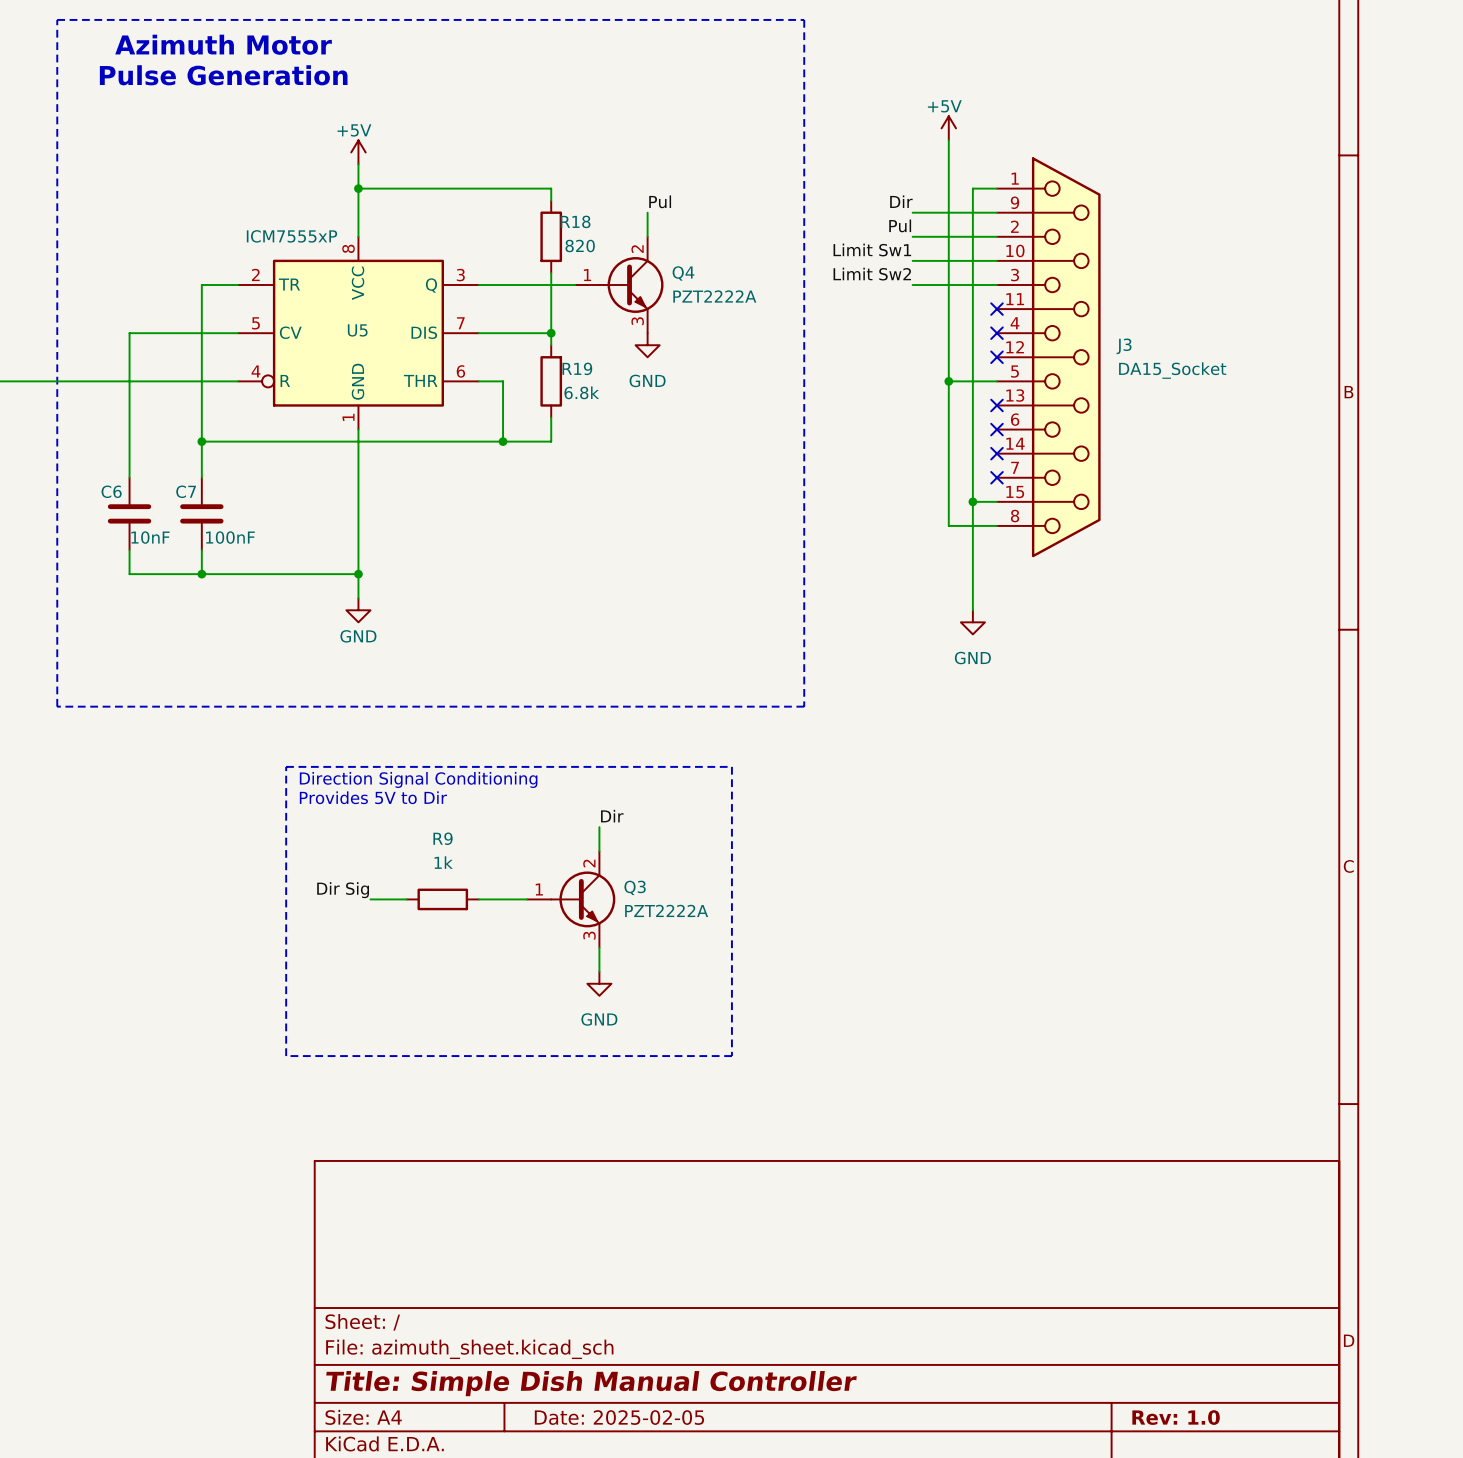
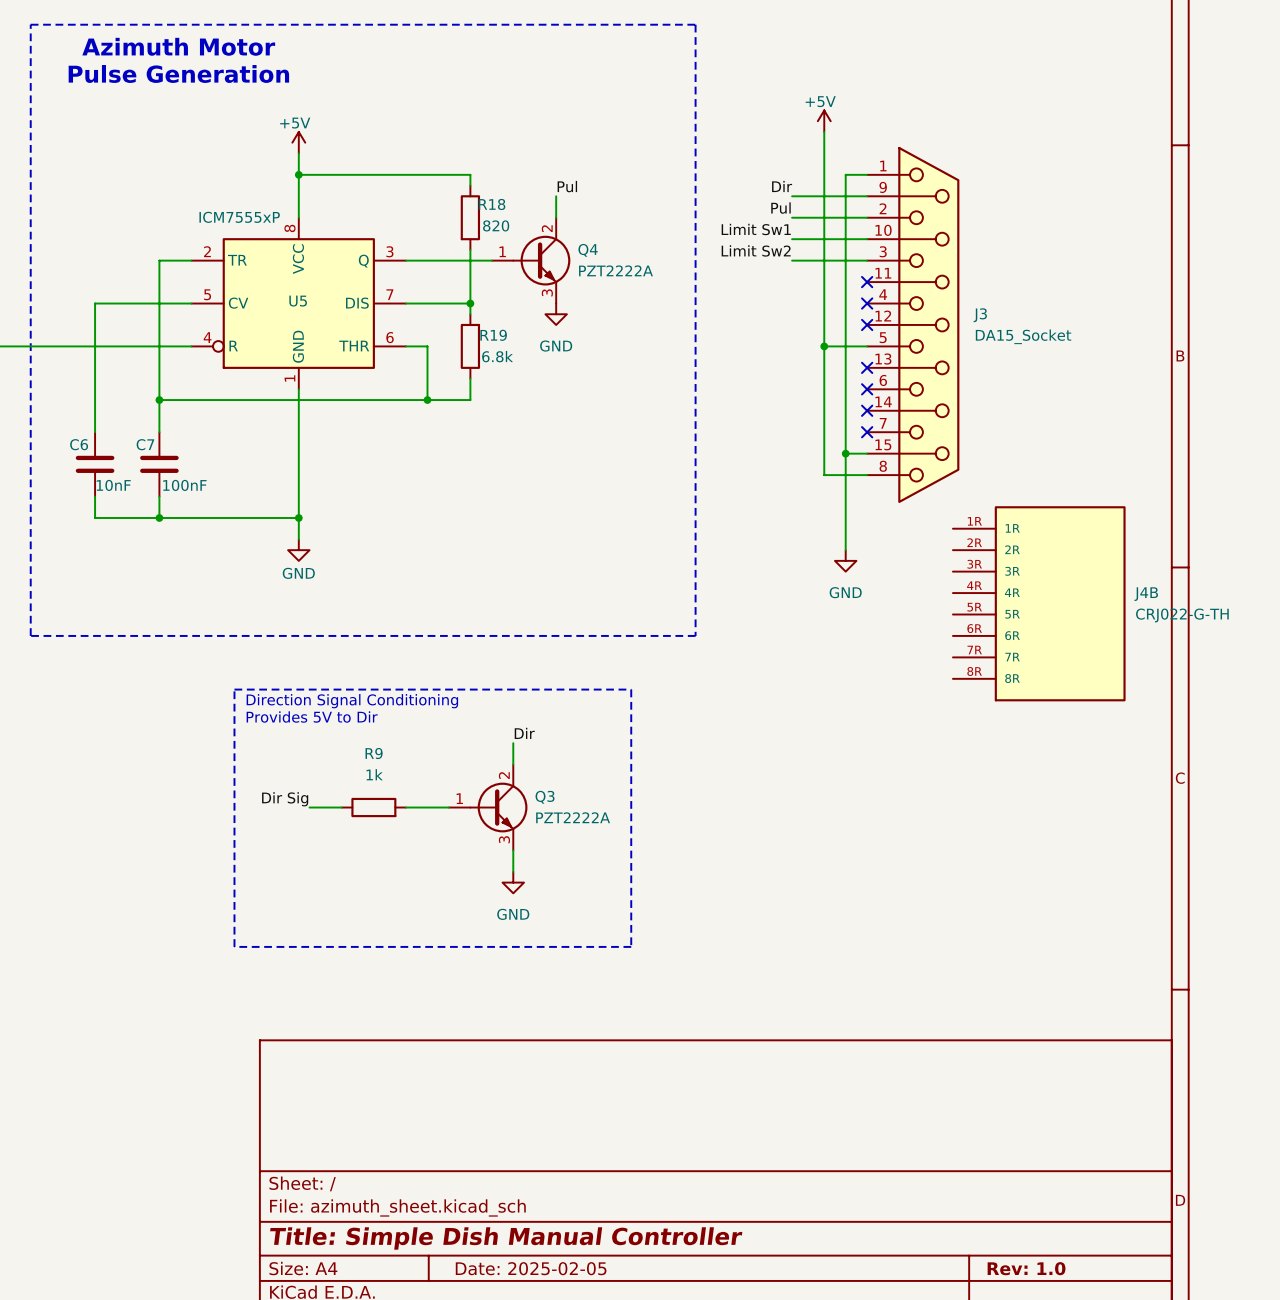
J4B: none -> CRJ022-G-TH (1039, 603)

